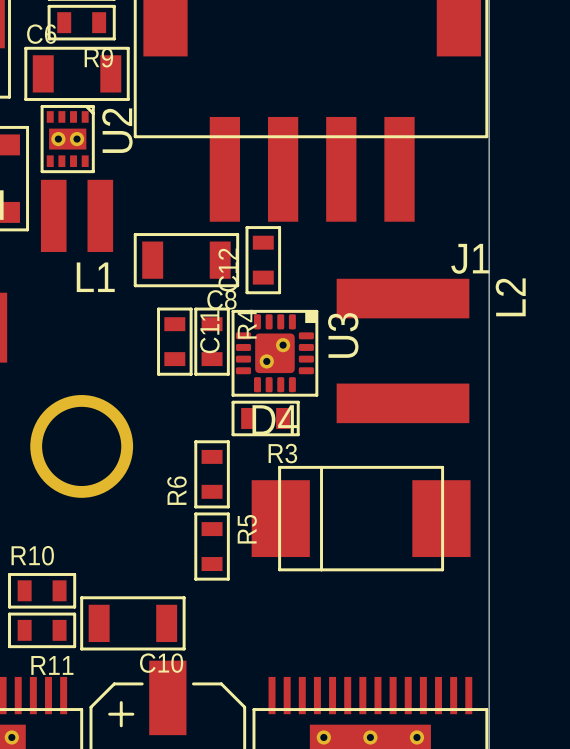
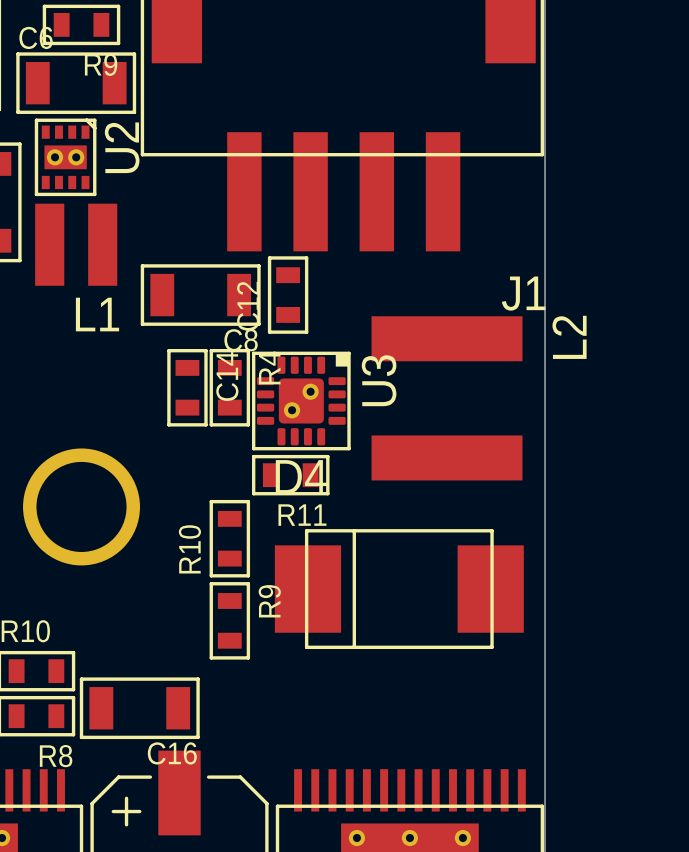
C11 name: C11 (209, 331) -> C14 (227, 376)
R3 name: R3 (282, 453) -> R11 (302, 515)
R6 name: R6 (176, 490) -> R10 (189, 549)
R5 name: R5 (247, 529) -> R9 (269, 601)
C10 name: C10 (161, 663) -> C16 (172, 753)
R11 name: R11 (52, 665) -> R8 (56, 756)

